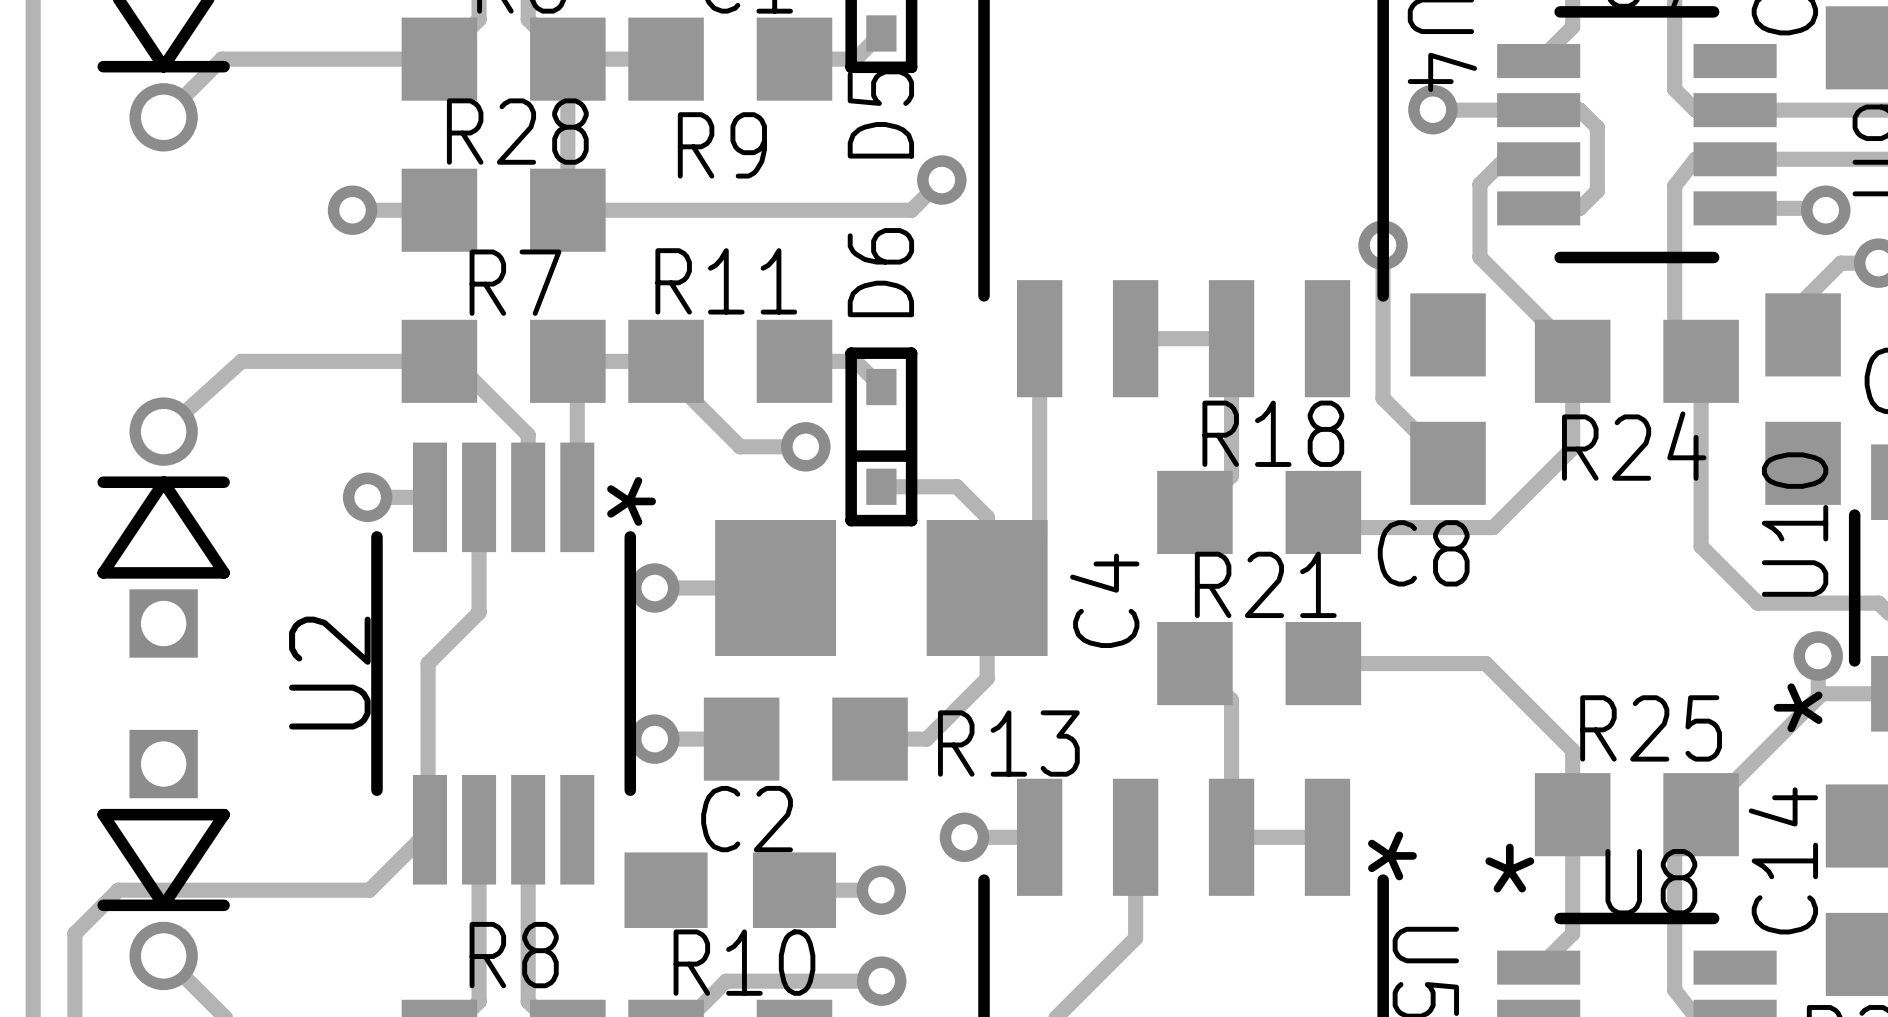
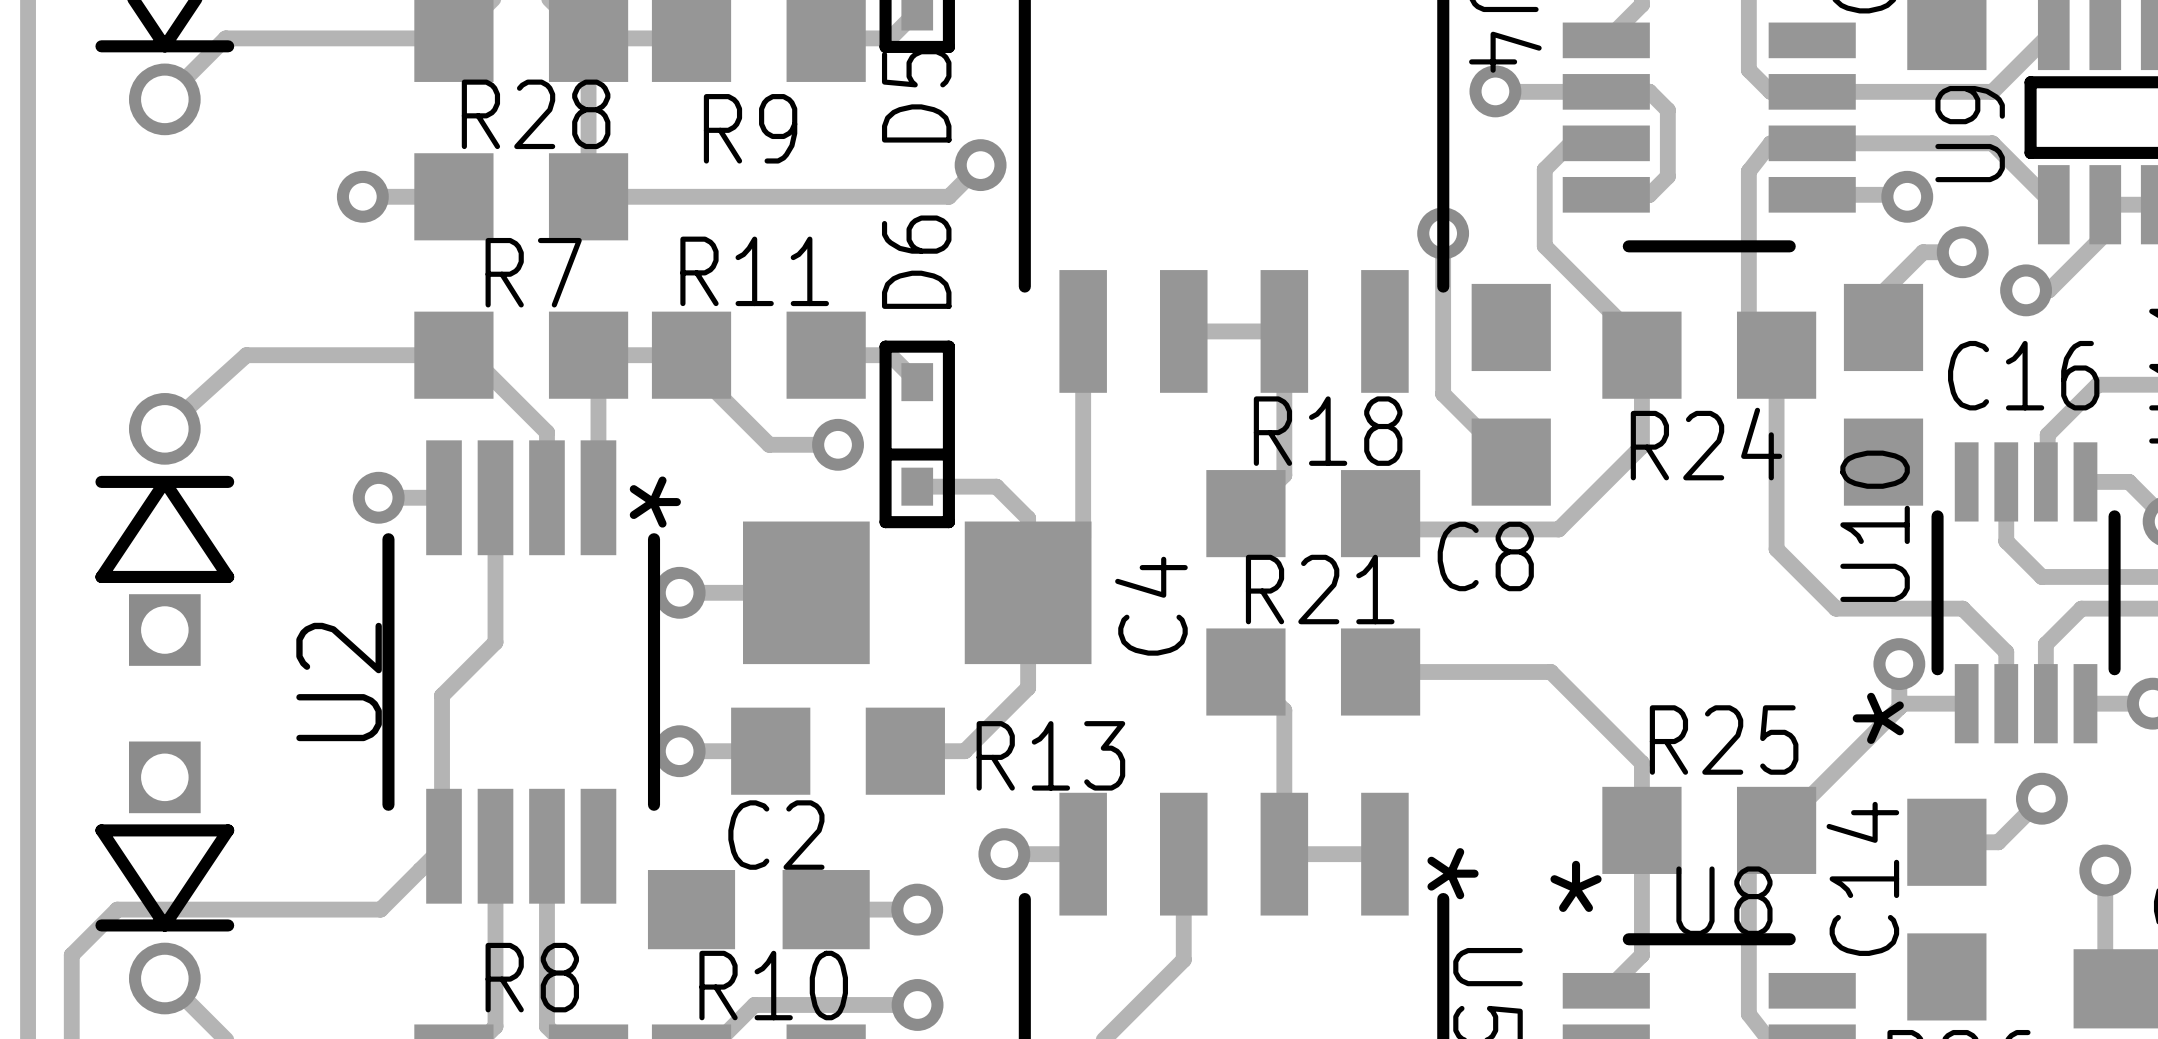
track: (479, 612) (428, 663) (428, 686) -> (495, 618) (495, 642) (442, 695)

